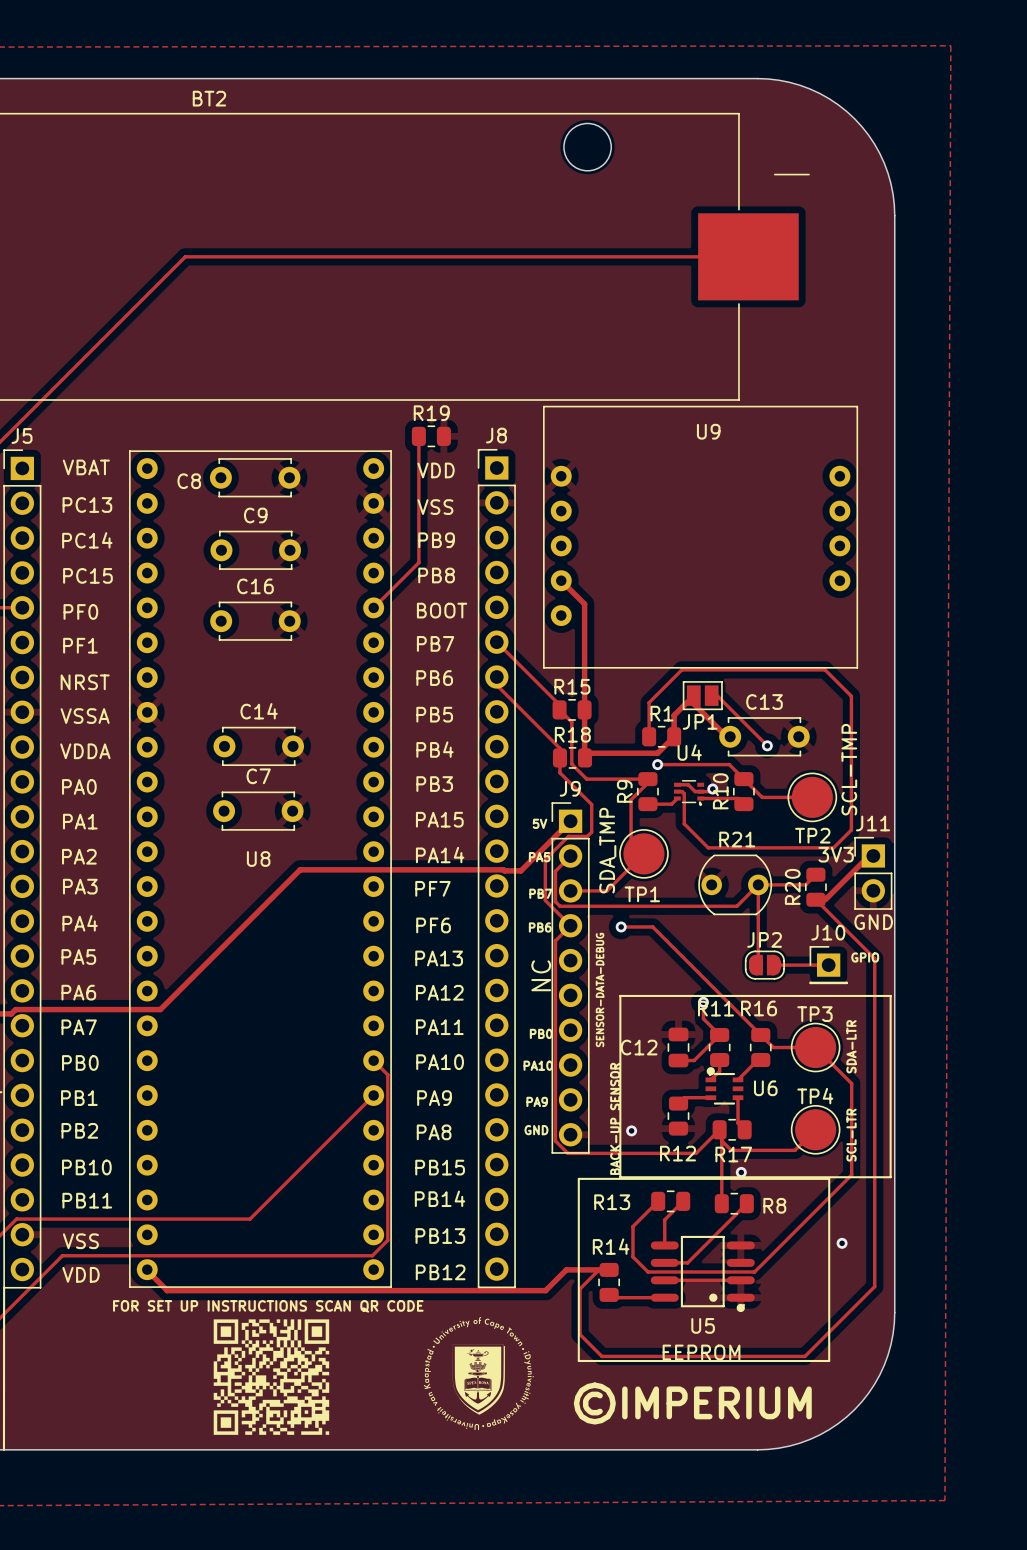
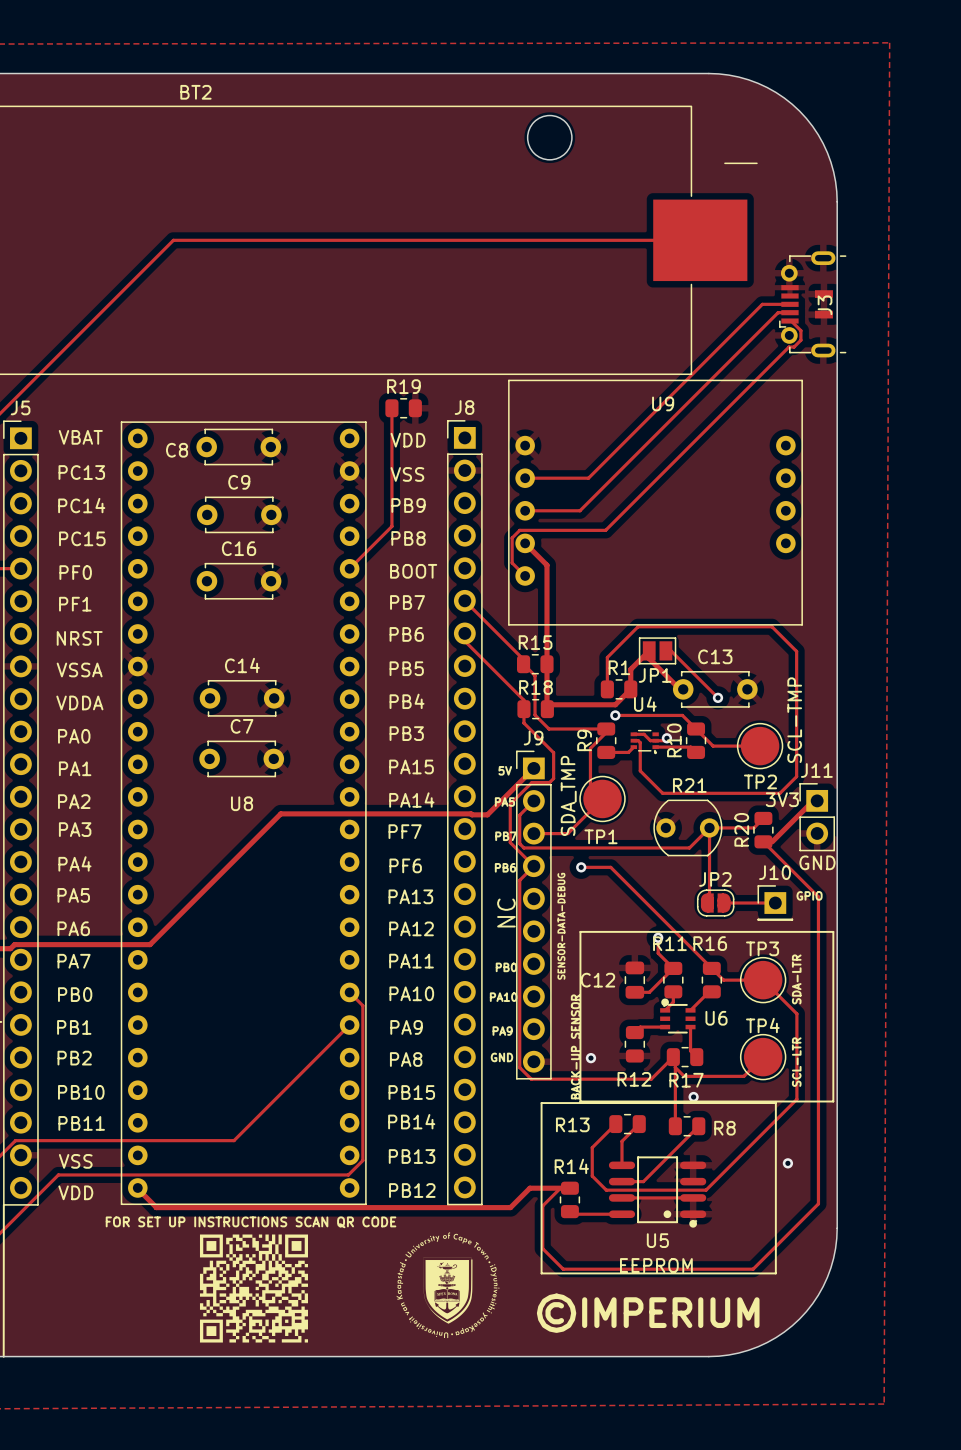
track: none -> (789, 304) (762, 304) (588, 478) (525, 478)
J3: none -> (812, 304)
track: none -> (789, 312) (778, 312) (580, 510) (525, 510)
track: none -> (789, 321) (800, 330) (800, 340) (794, 347) (788, 347) (605, 530) (519, 530) (512, 537) (512, 562) (525, 575)

